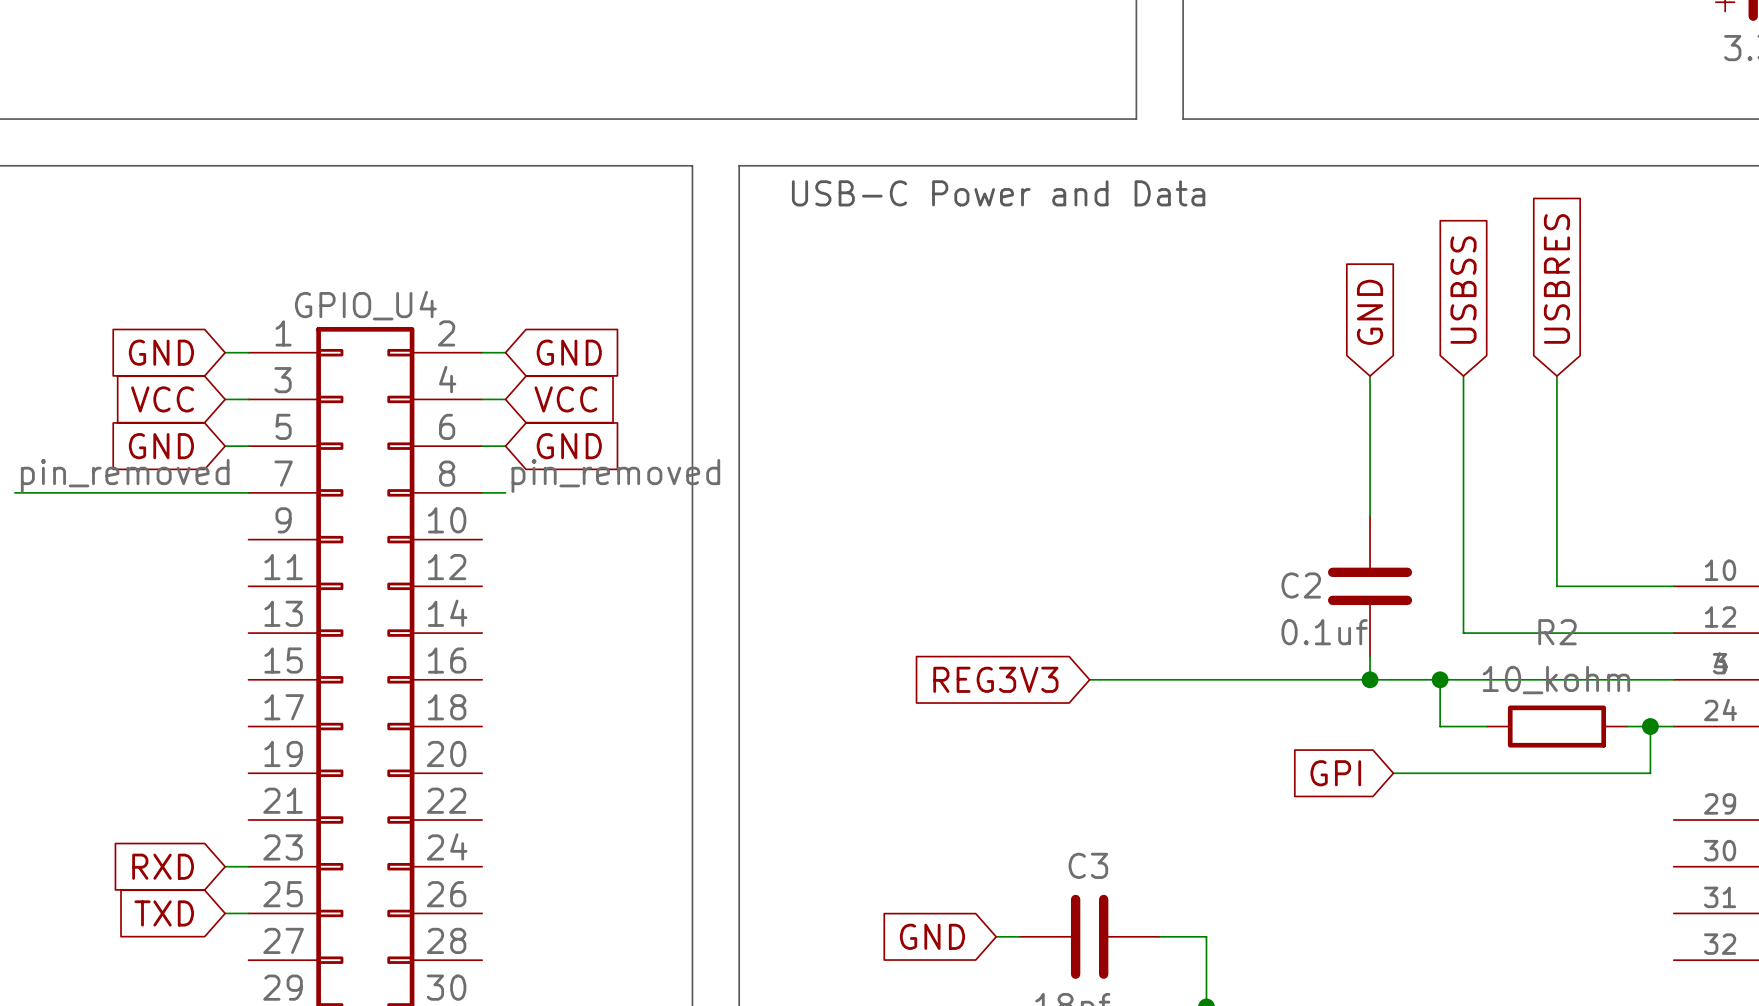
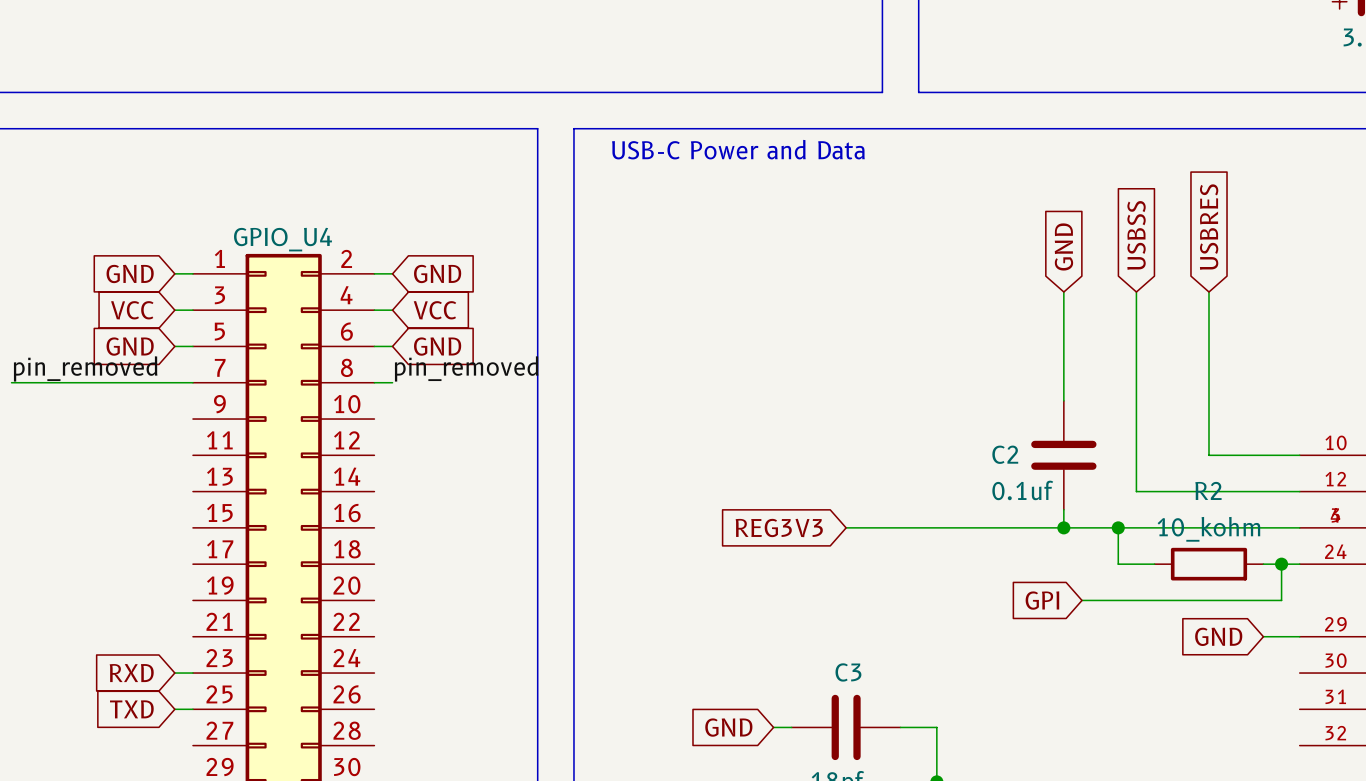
global label: none -> GND (1218, 636)
wire: none -> (1263, 636) (1299, 636)

